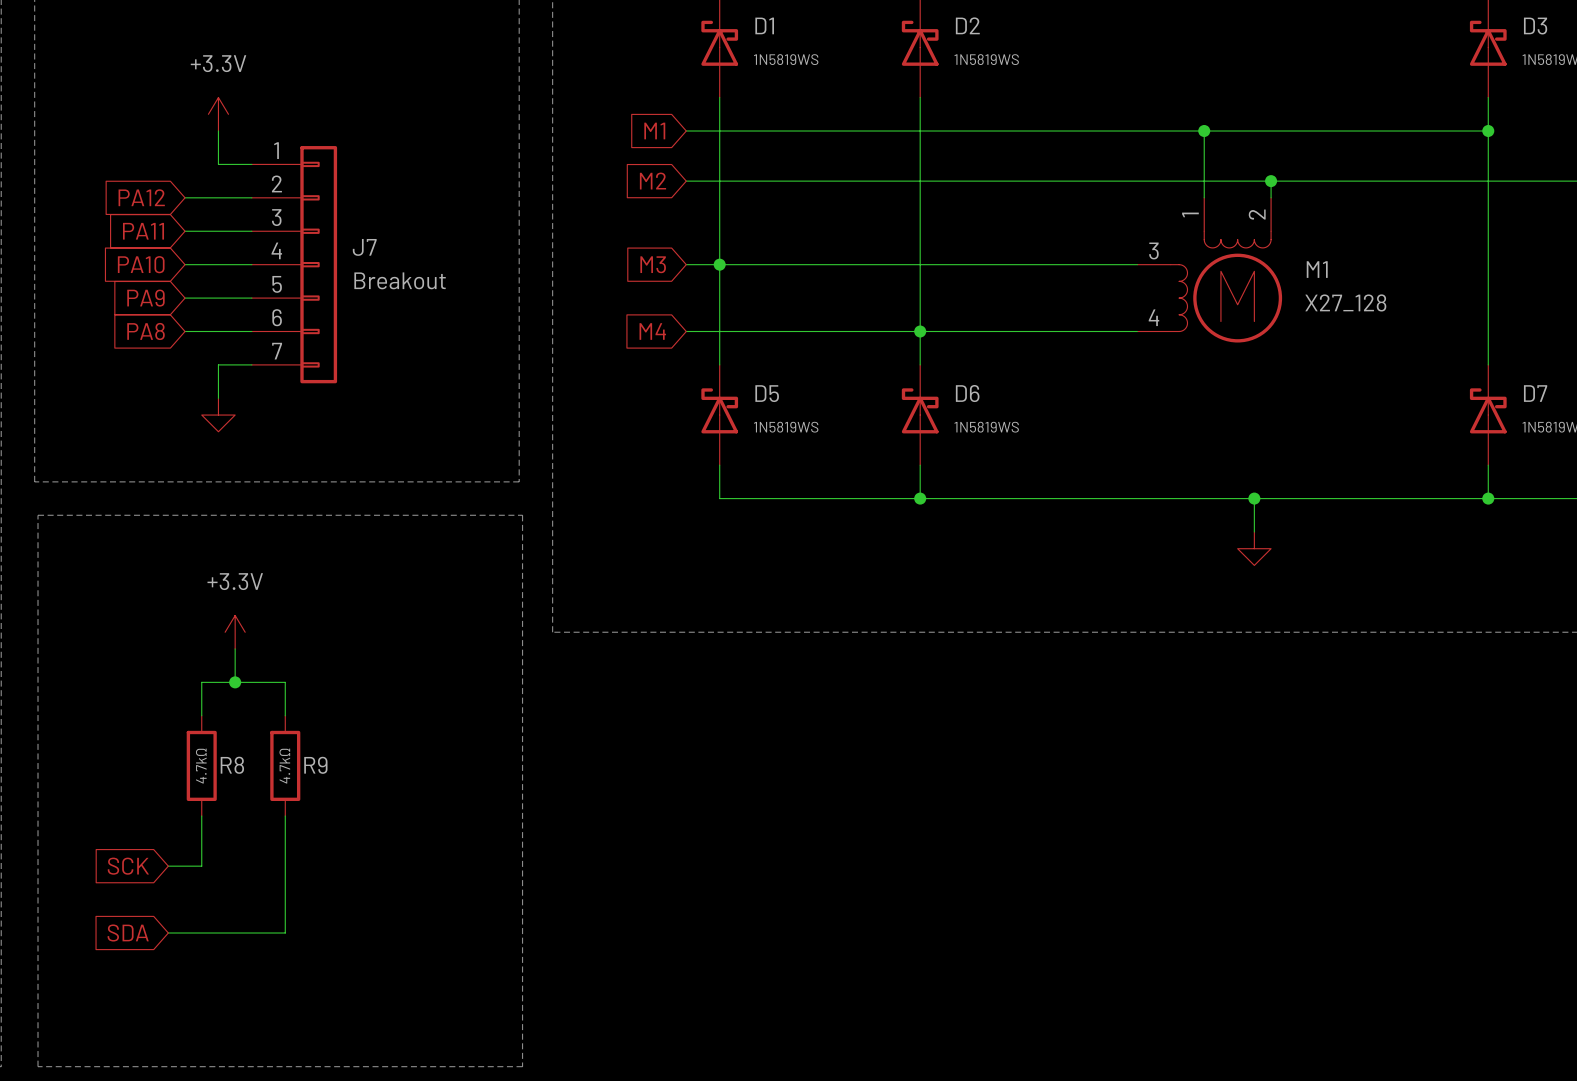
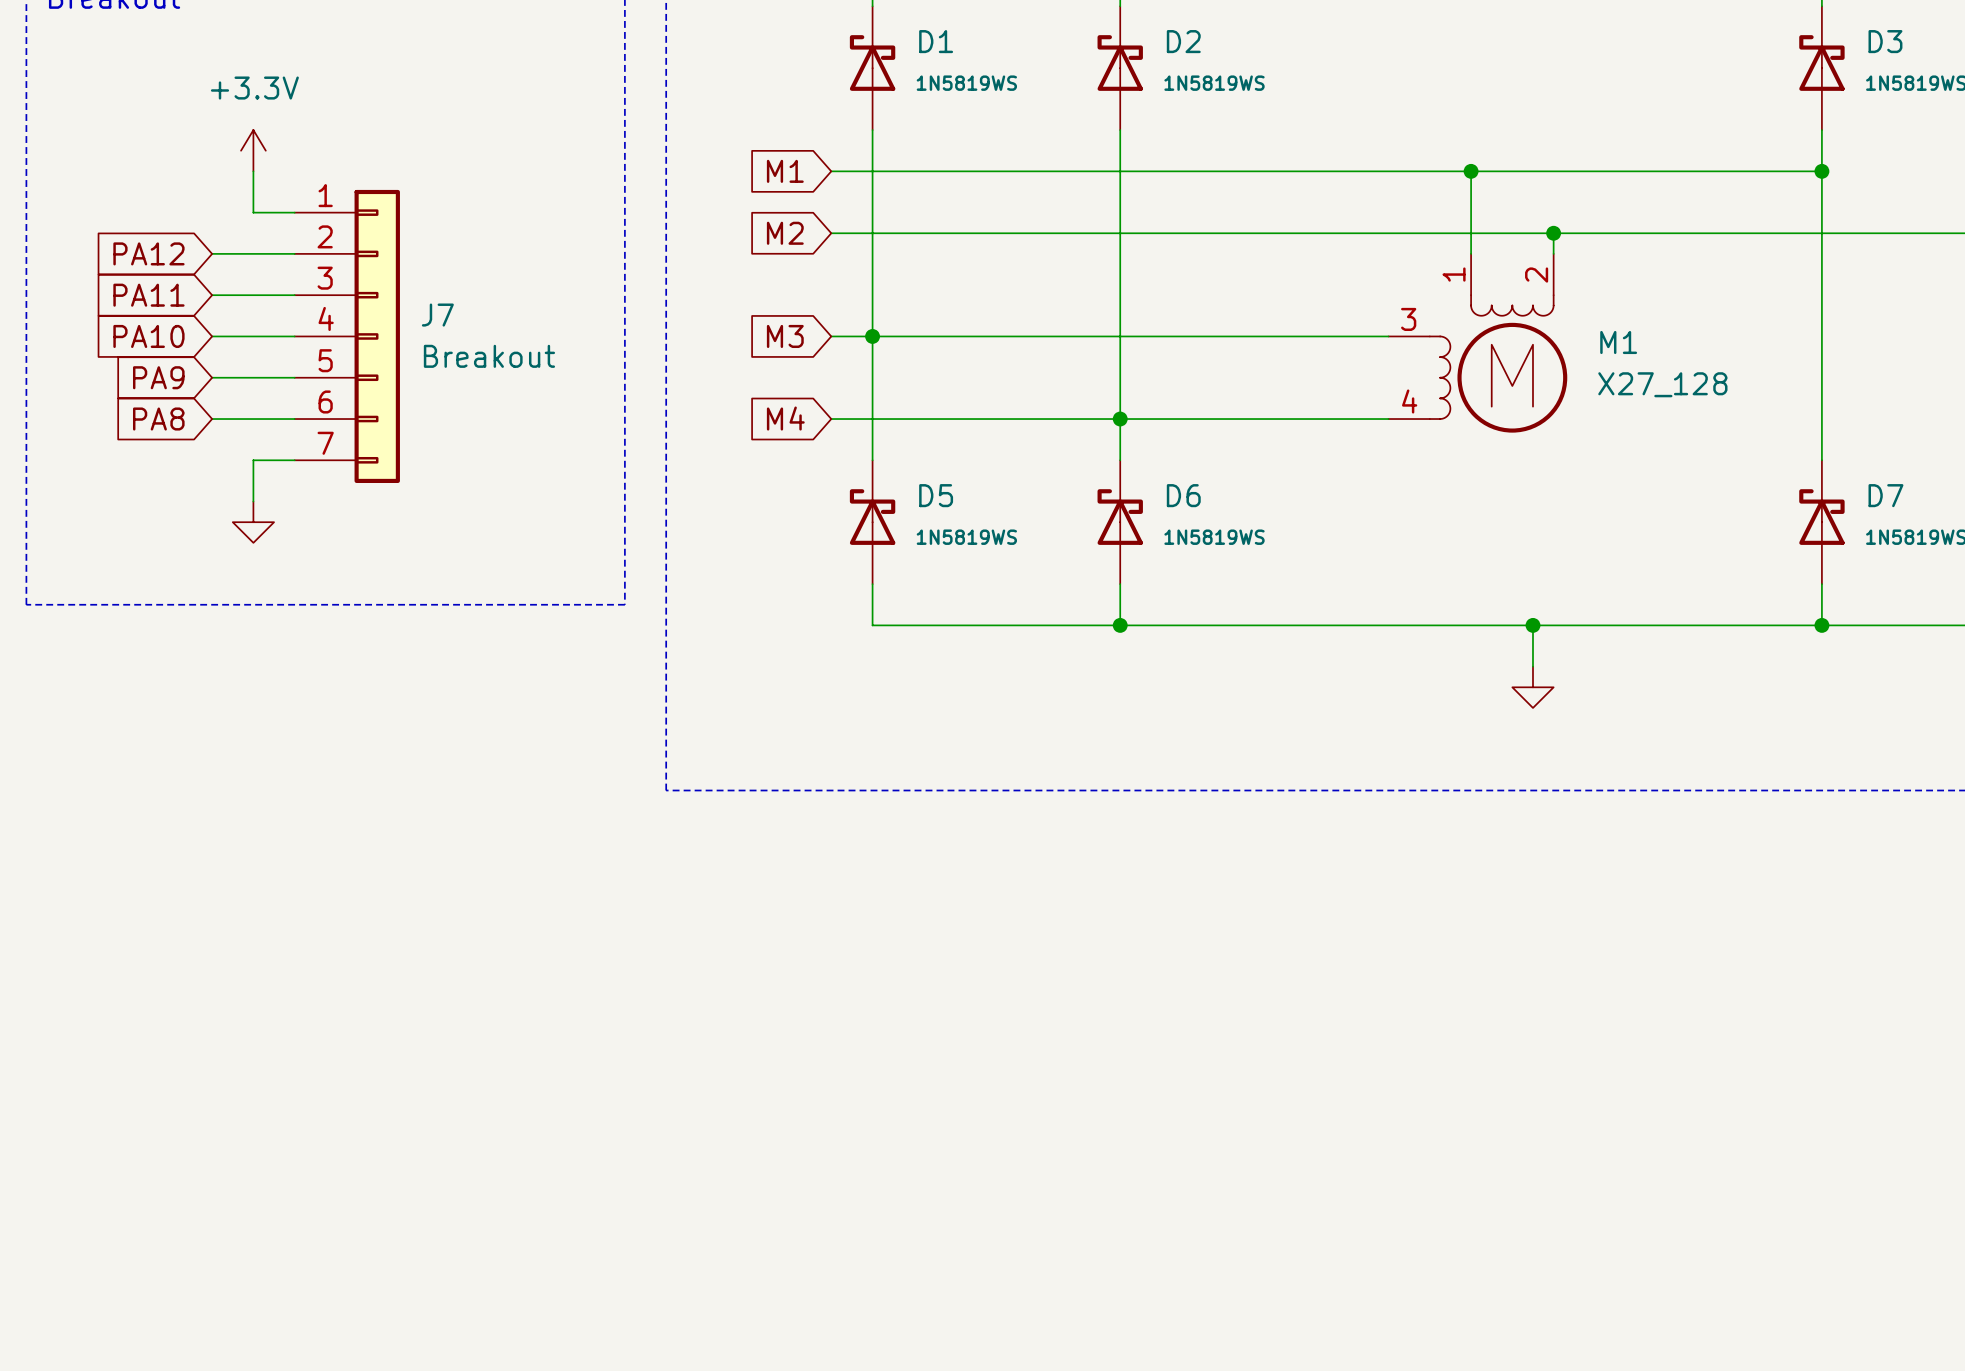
line: (38, 515) (522, 515) (522, 1066) (38, 1066) (38, 515) -> none
power symbol: +3.3V (235, 632) -> none
wire: (235, 648) (235, 682) -> none
junction: (235, 682) -> none
wire: (201, 715) (201, 682) (285, 682) (285, 715) -> none
R8: 4.7kΩ (201, 765) -> none
R9: 4.7kΩ (285, 765) -> none
wire: (201, 816) (201, 866) (168, 866) -> none
wire: (285, 816) (285, 933) (168, 933) -> none
global label: SCK (128, 866) -> none
global label: SDA (128, 933) -> none

